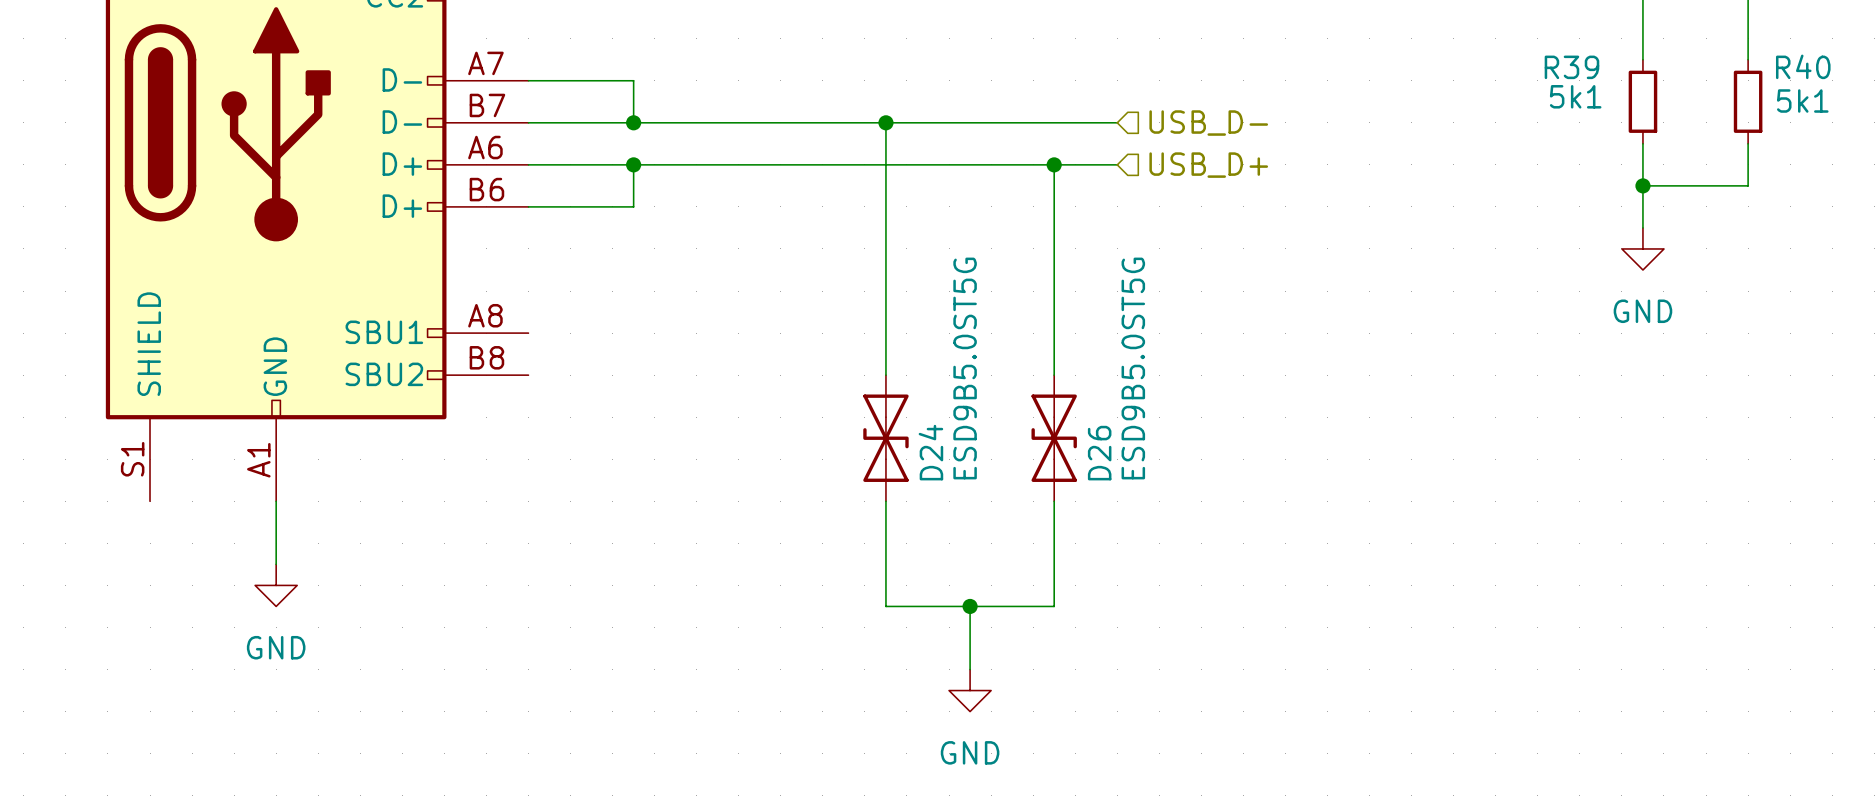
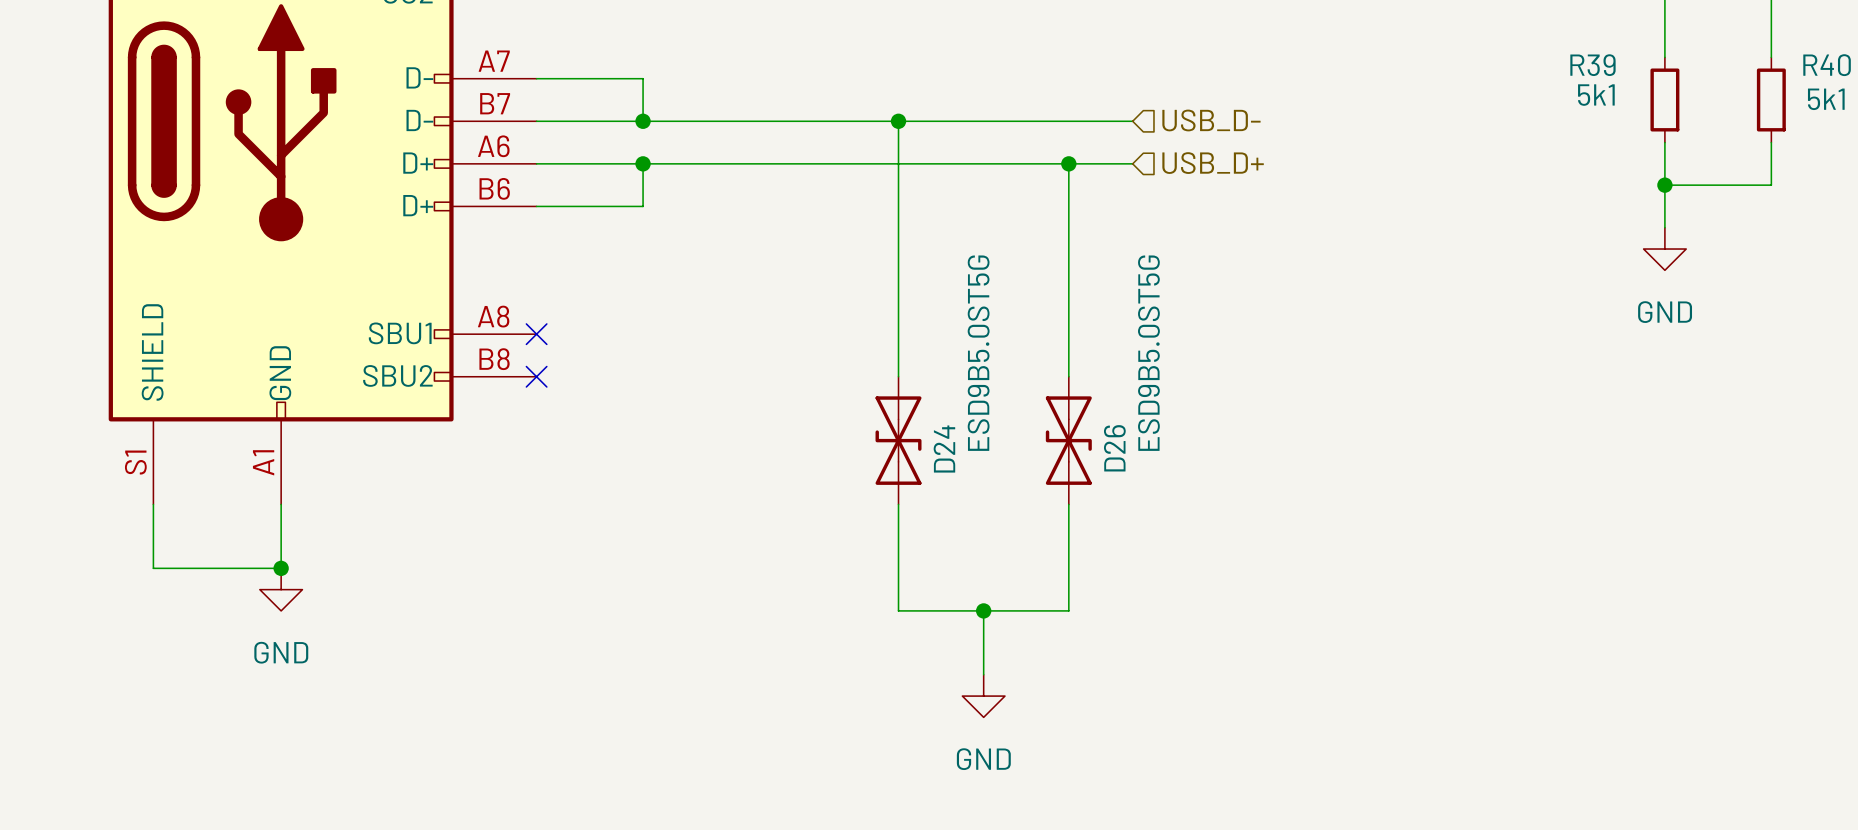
no-connect mark: none -> (536, 334)
no-connect mark: none -> (536, 376)
wire: none -> (153, 504) (153, 568) (281, 568)
junction: none -> (281, 568)

